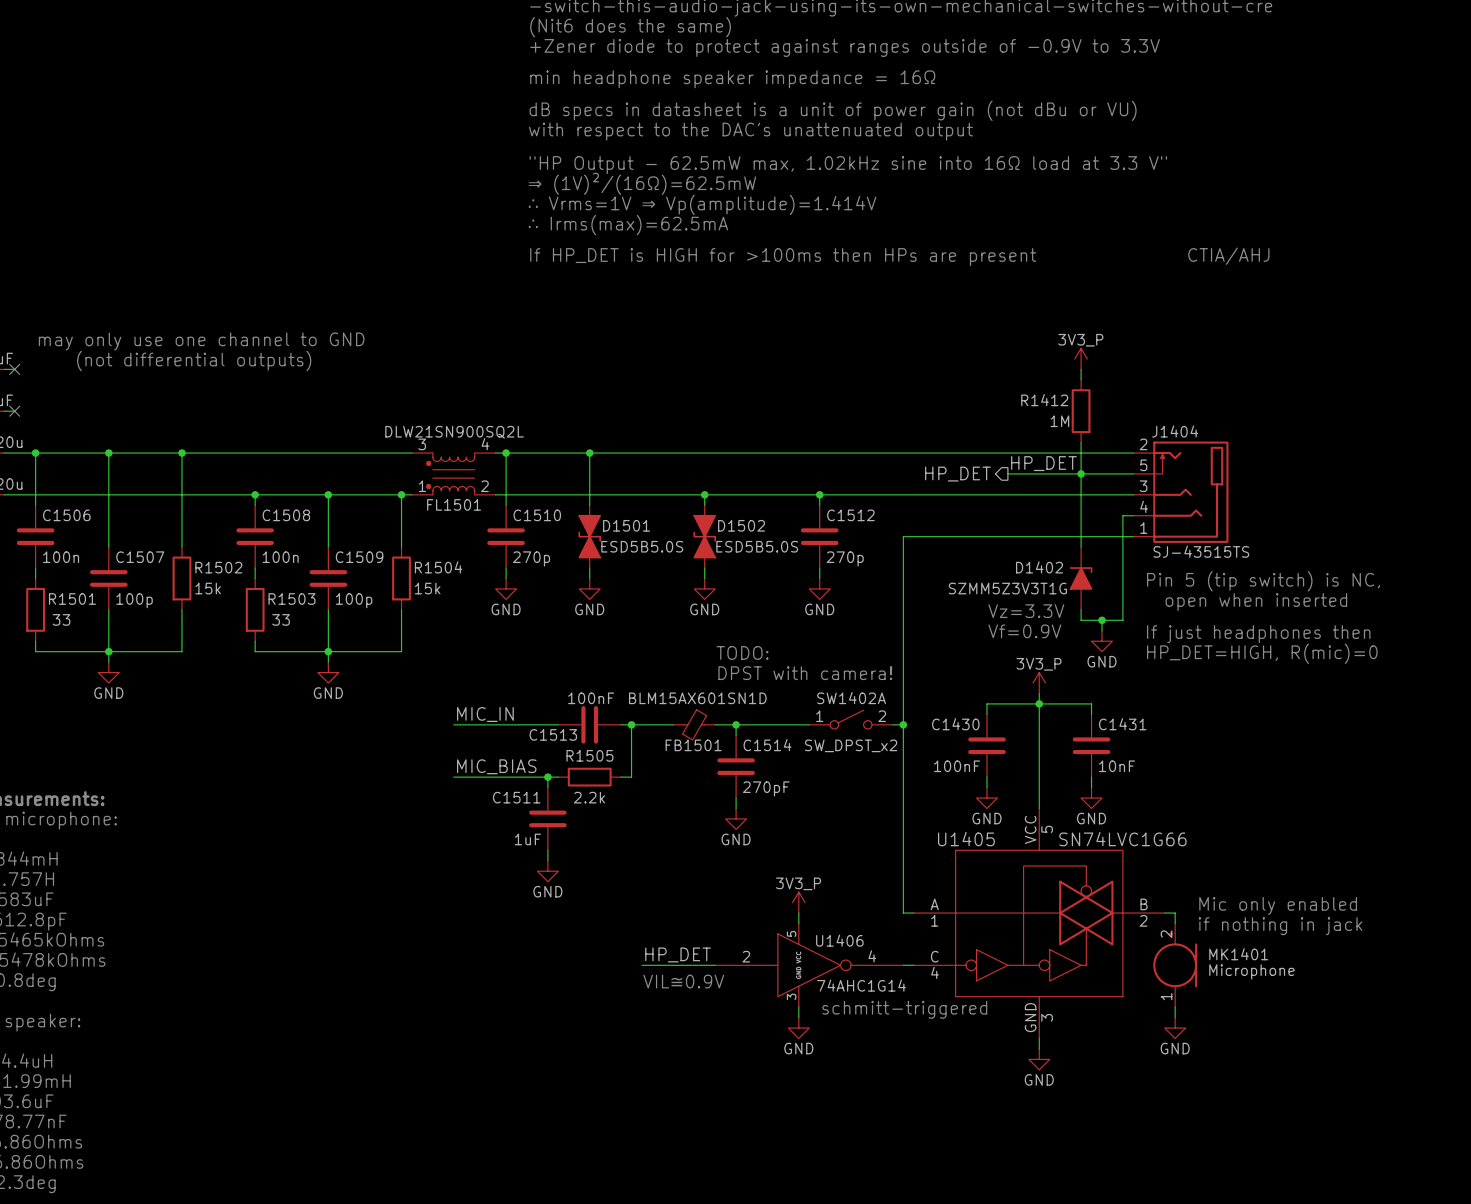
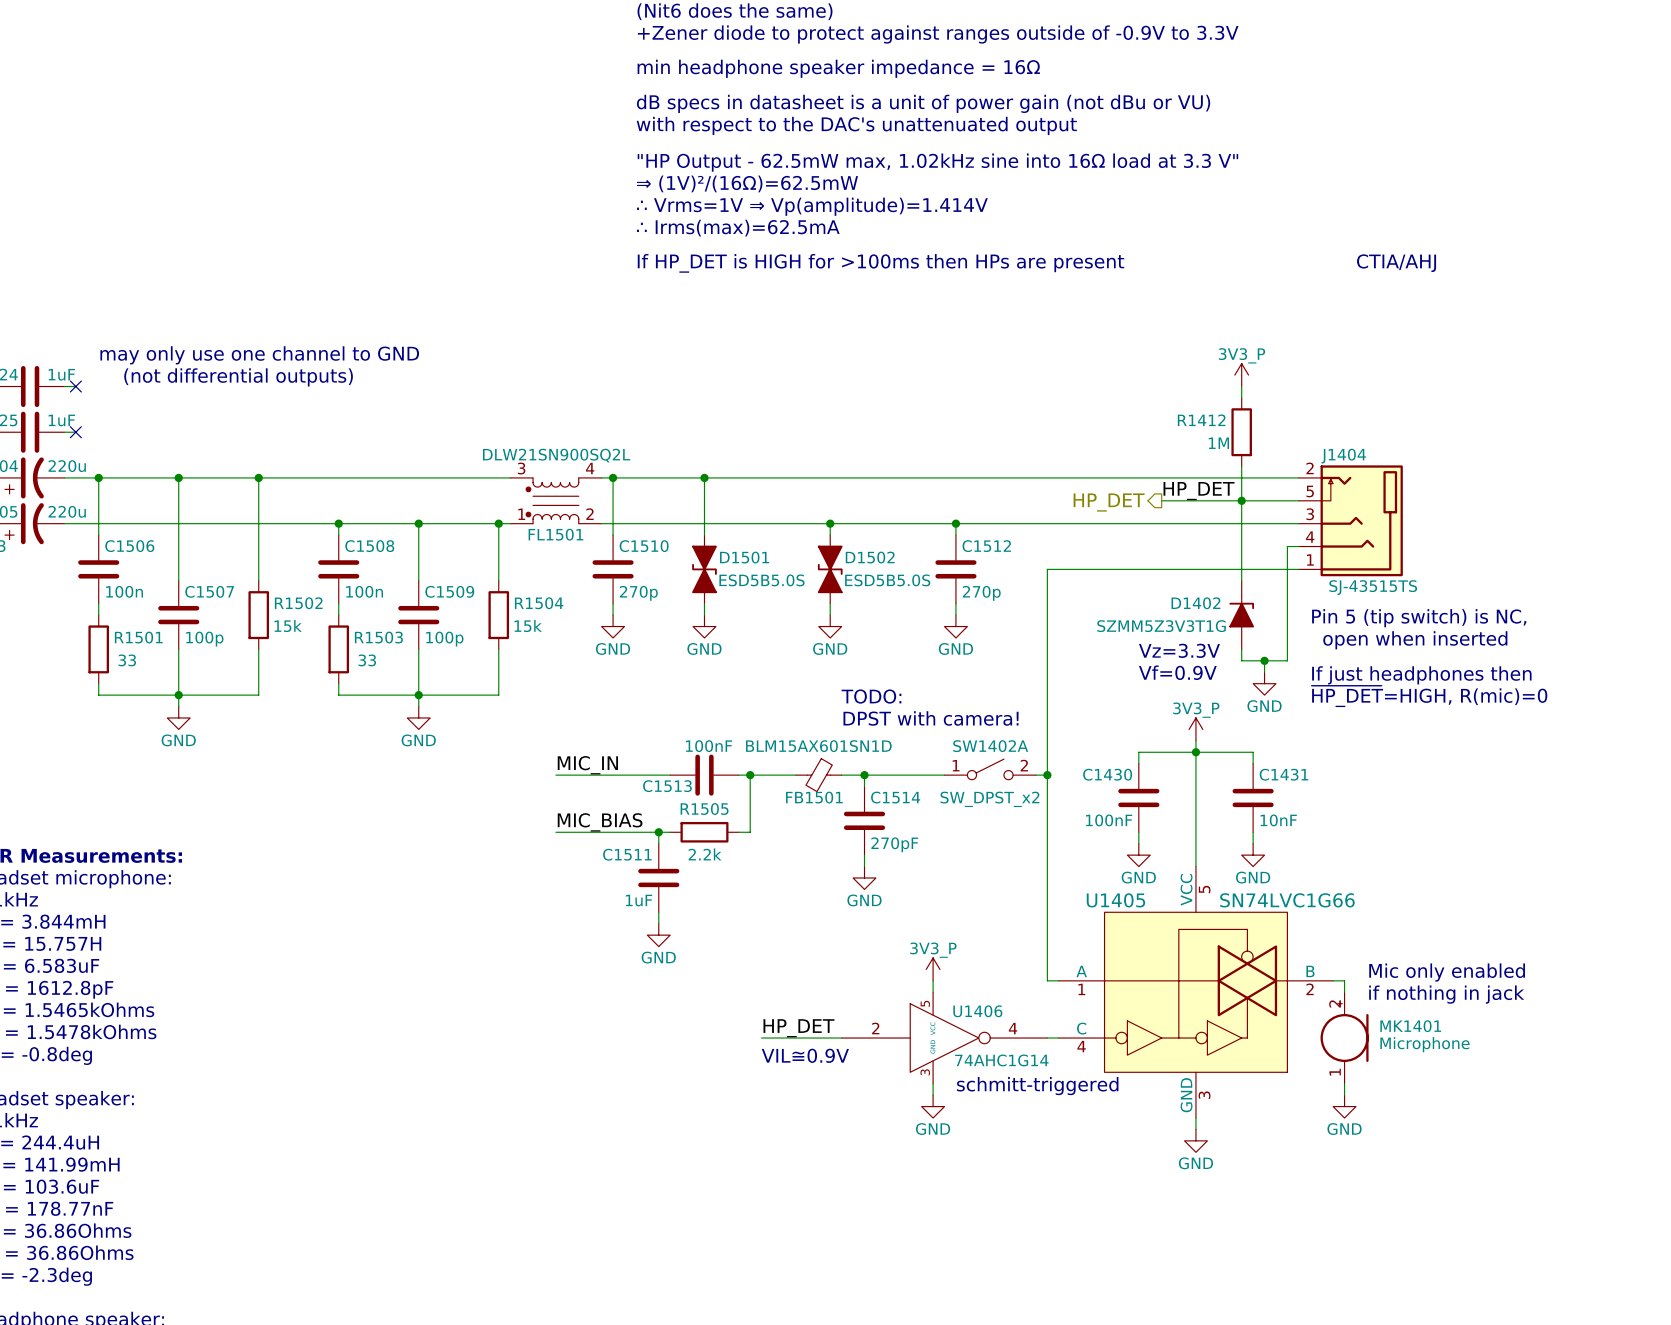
text: HP_DET=HIGH, R(mic)=0 (1262, 653) -> ~{HP_DET}=HIGH, R(mic)=0 (1429, 696)

